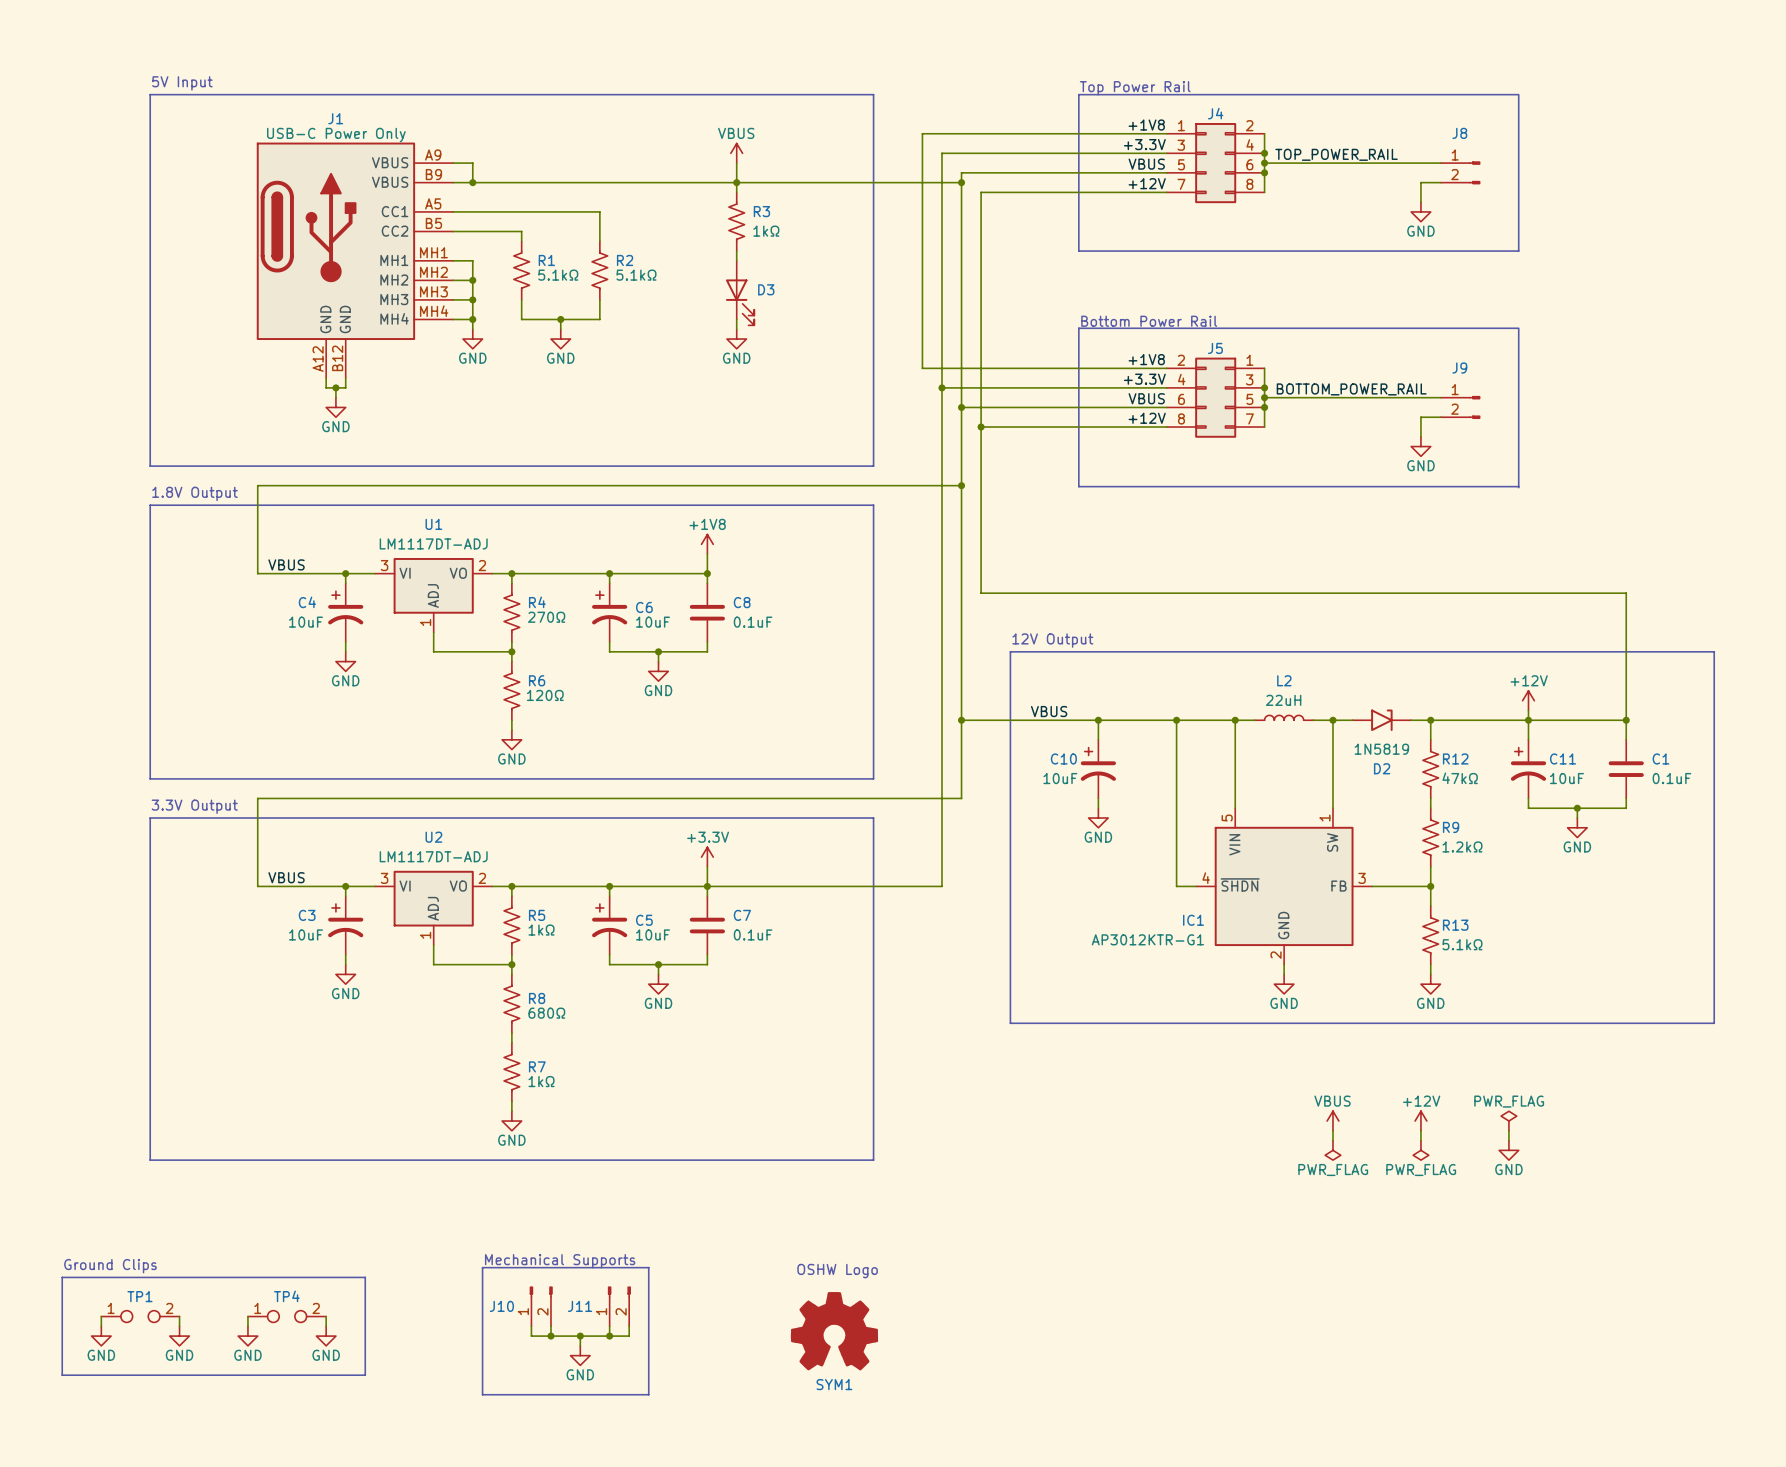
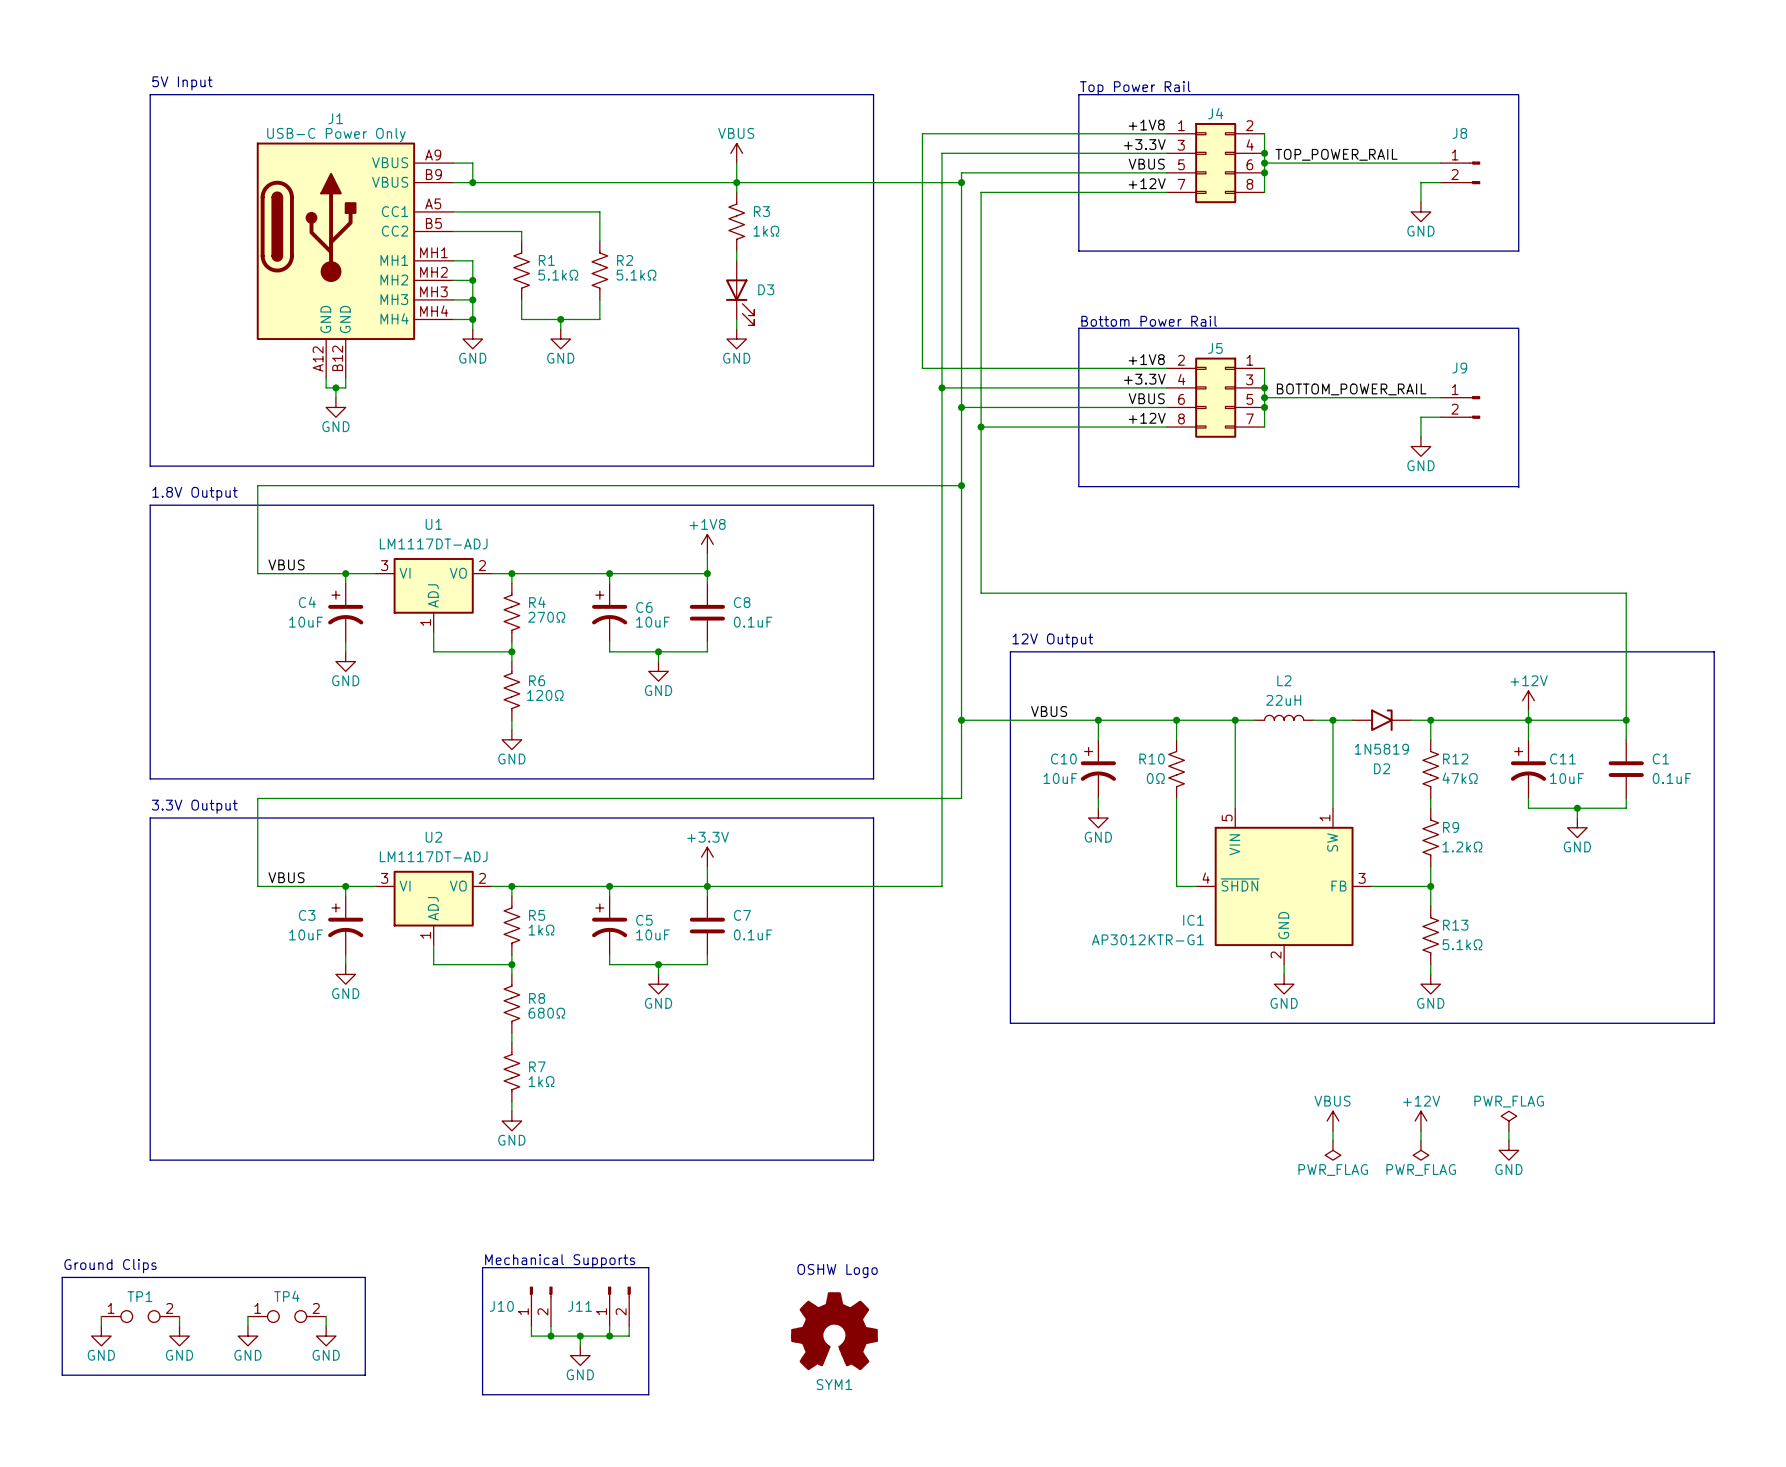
R10: none -> 0Ω (1176, 769)

